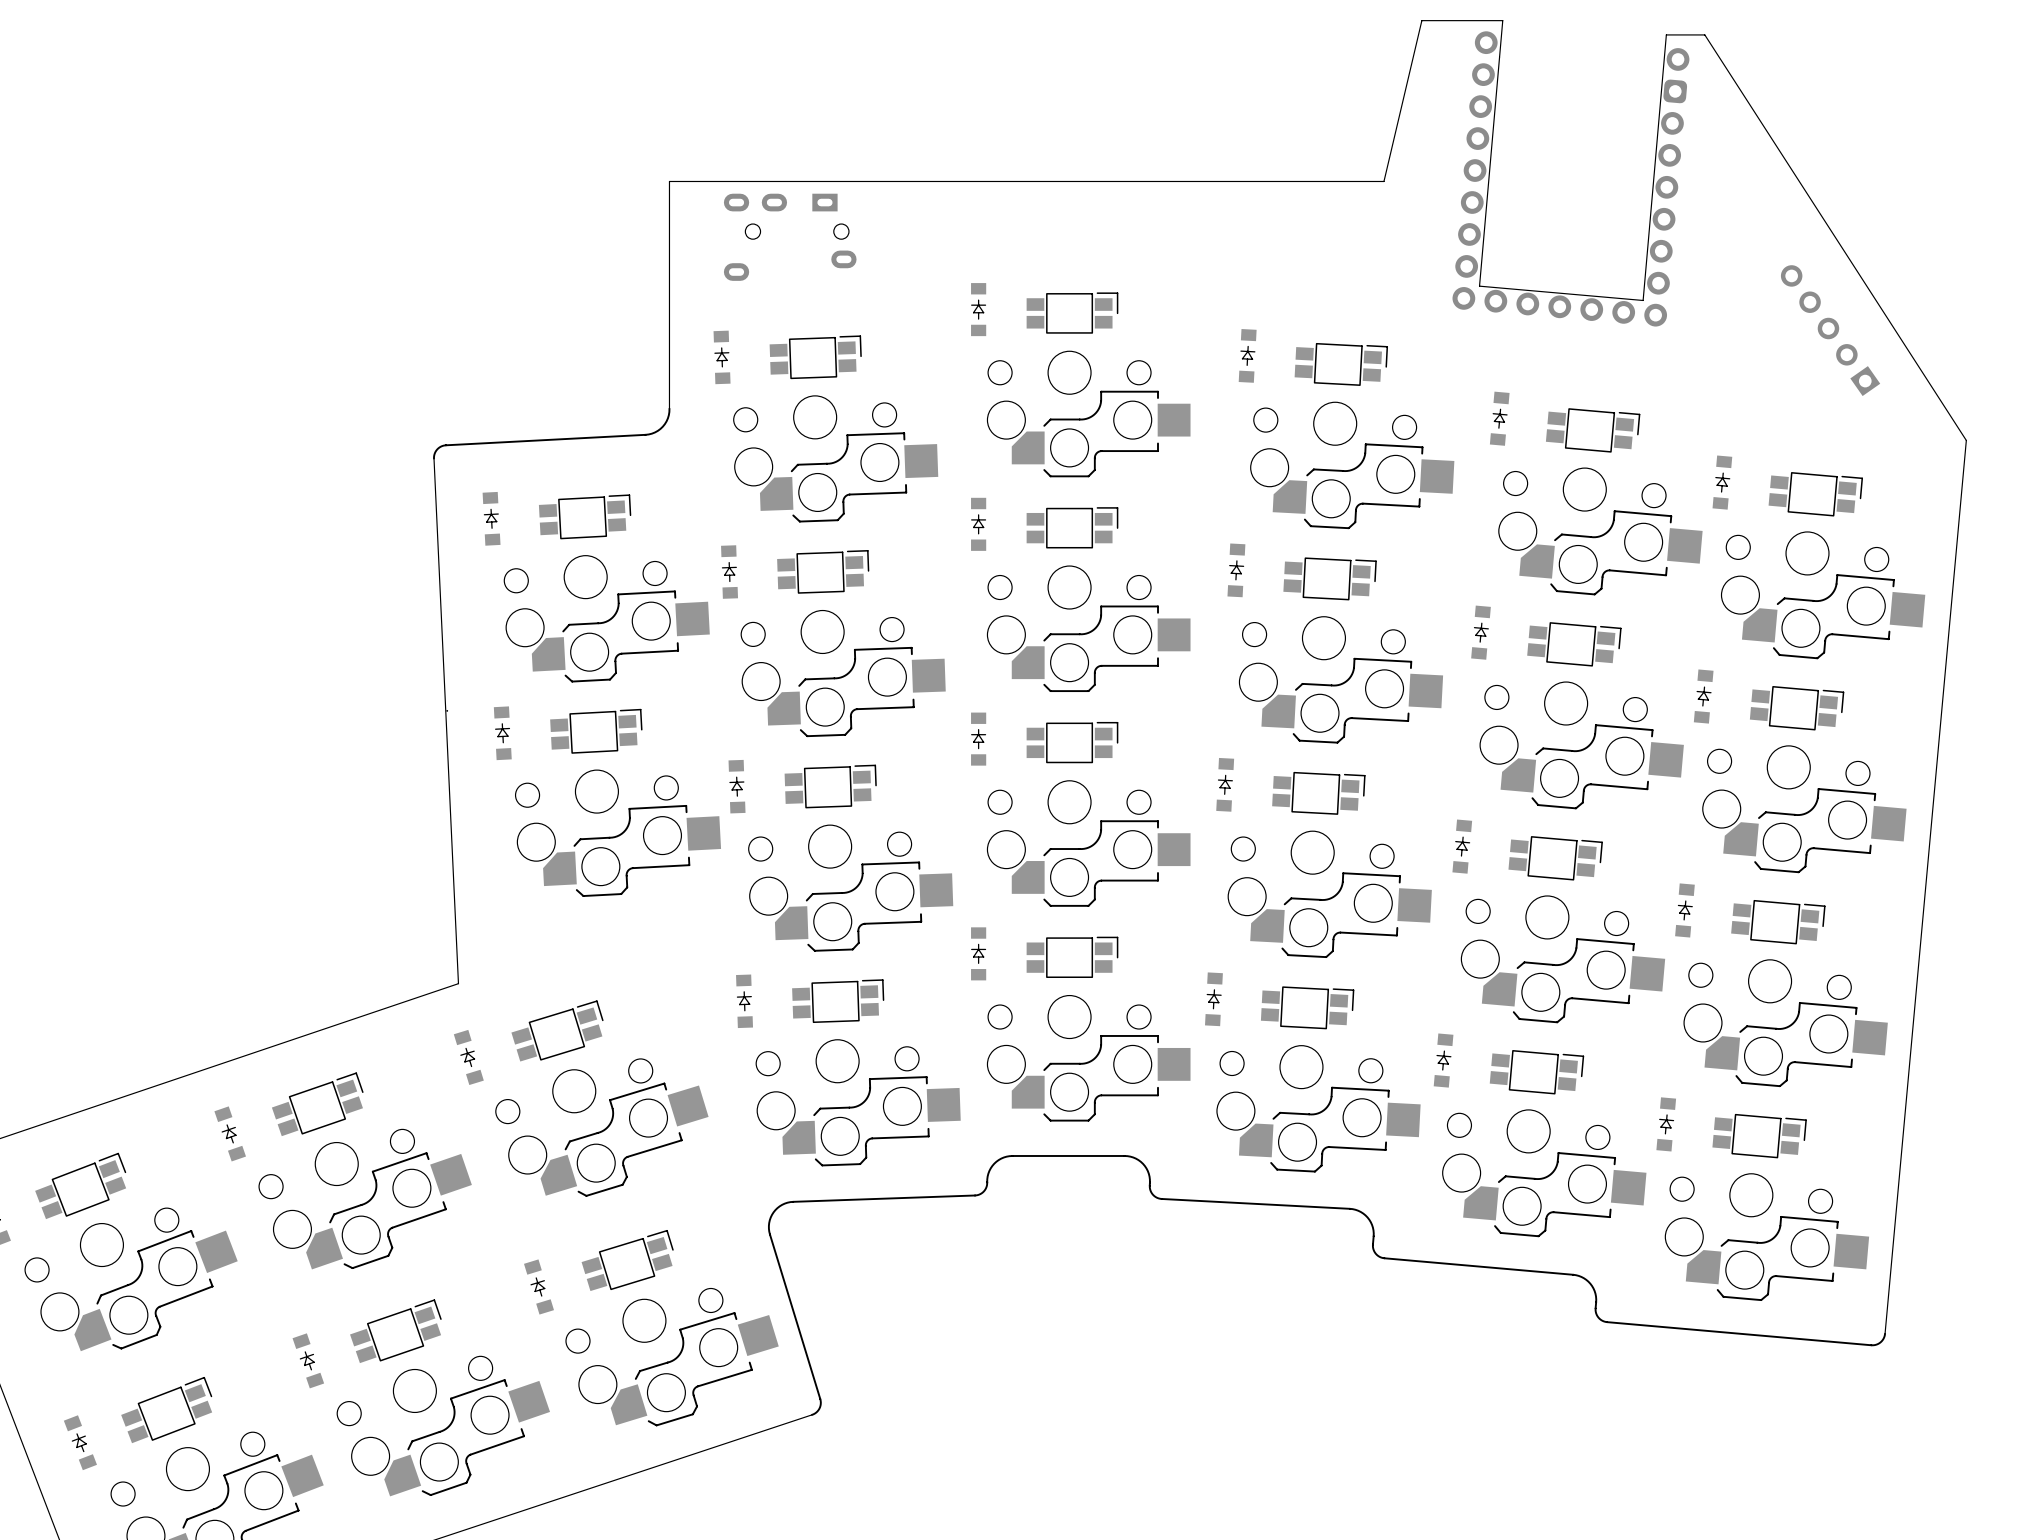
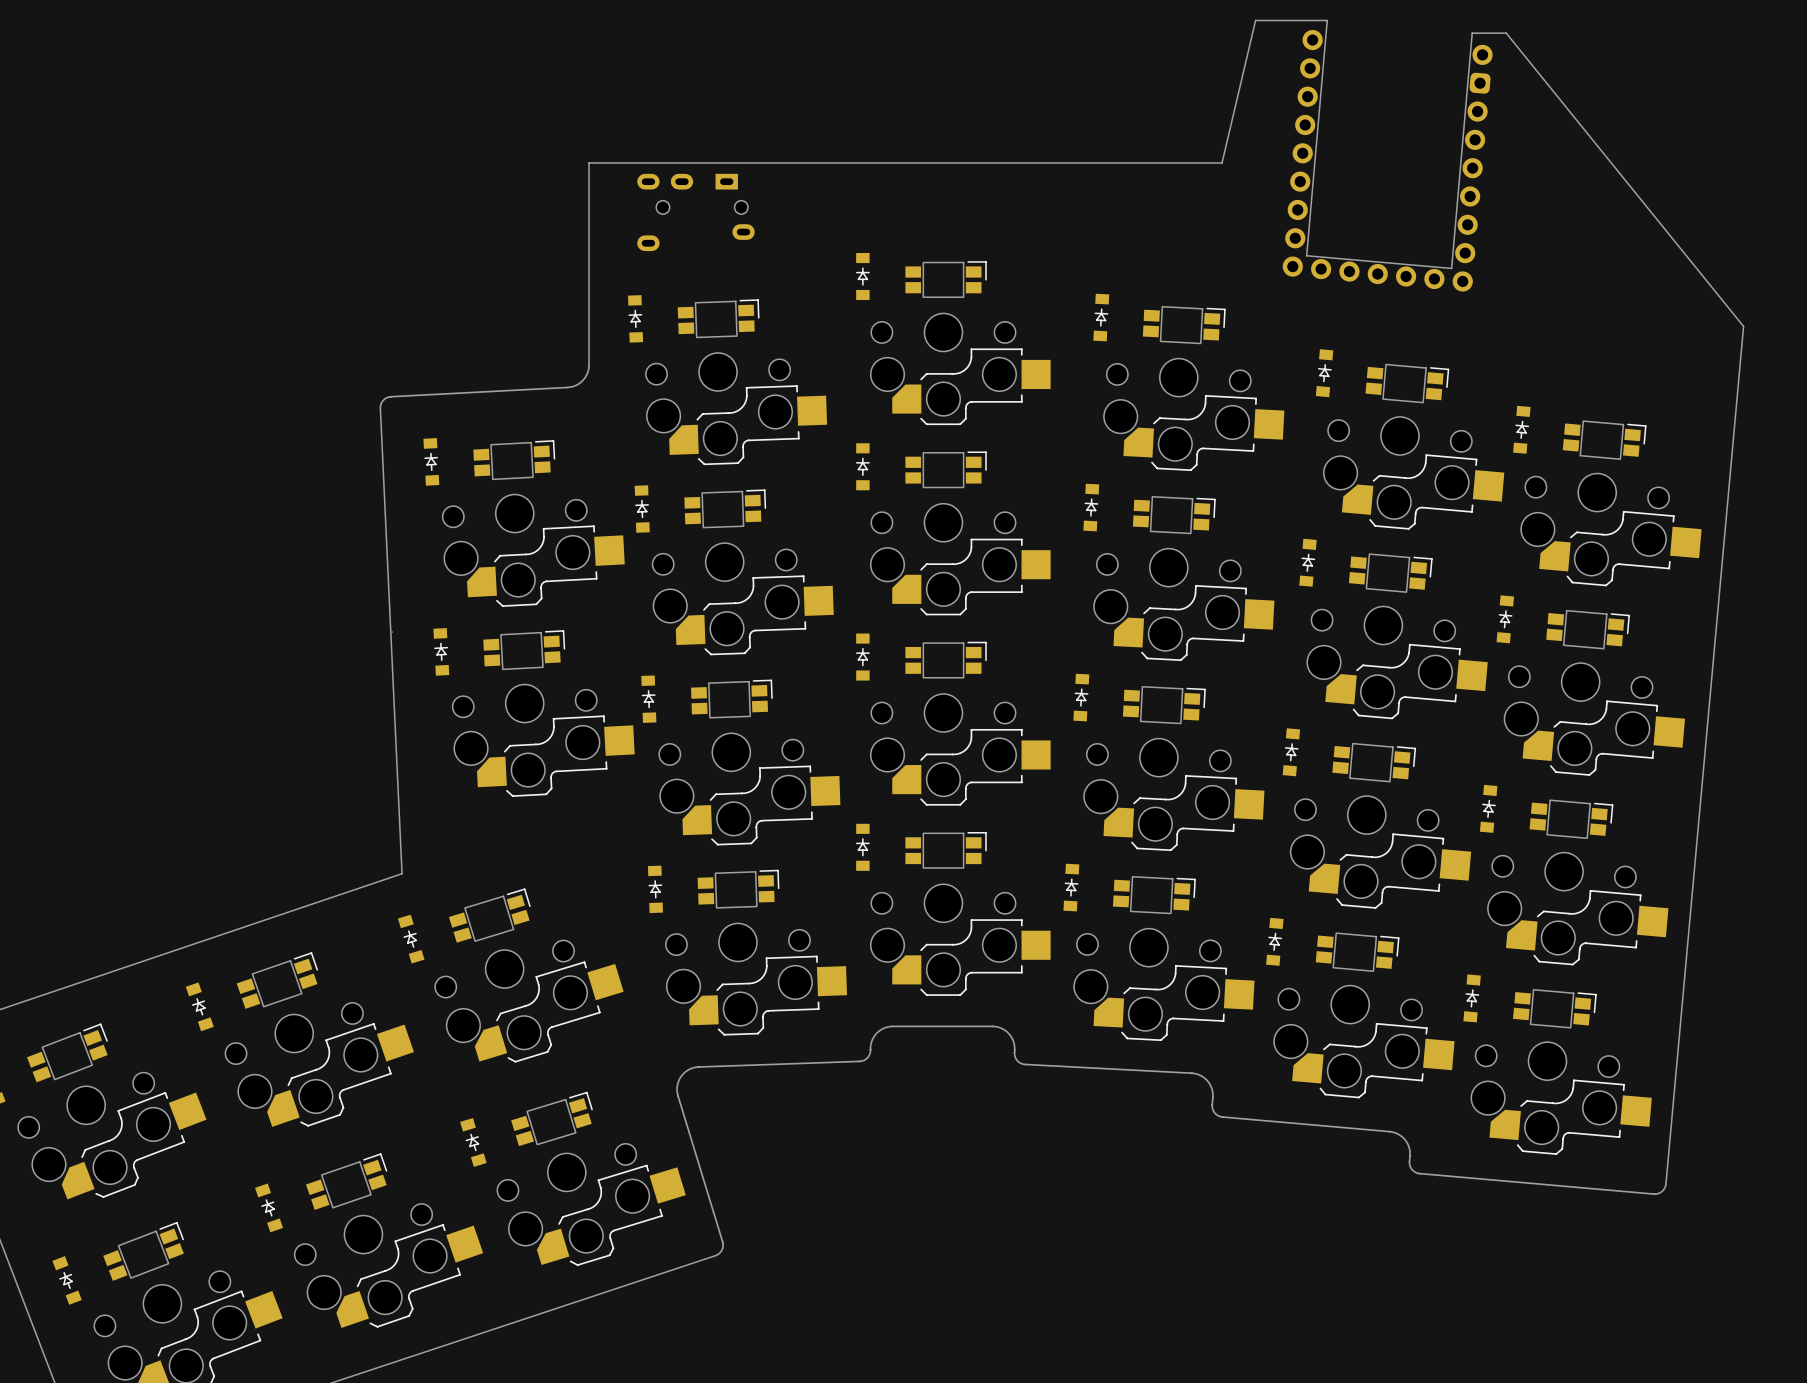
board edge: (1704, 34) (1966, 440) (1885, 1333) -> (1506, 33) (1743, 326) (1665, 1183)
part: (1830, 330) -> none

